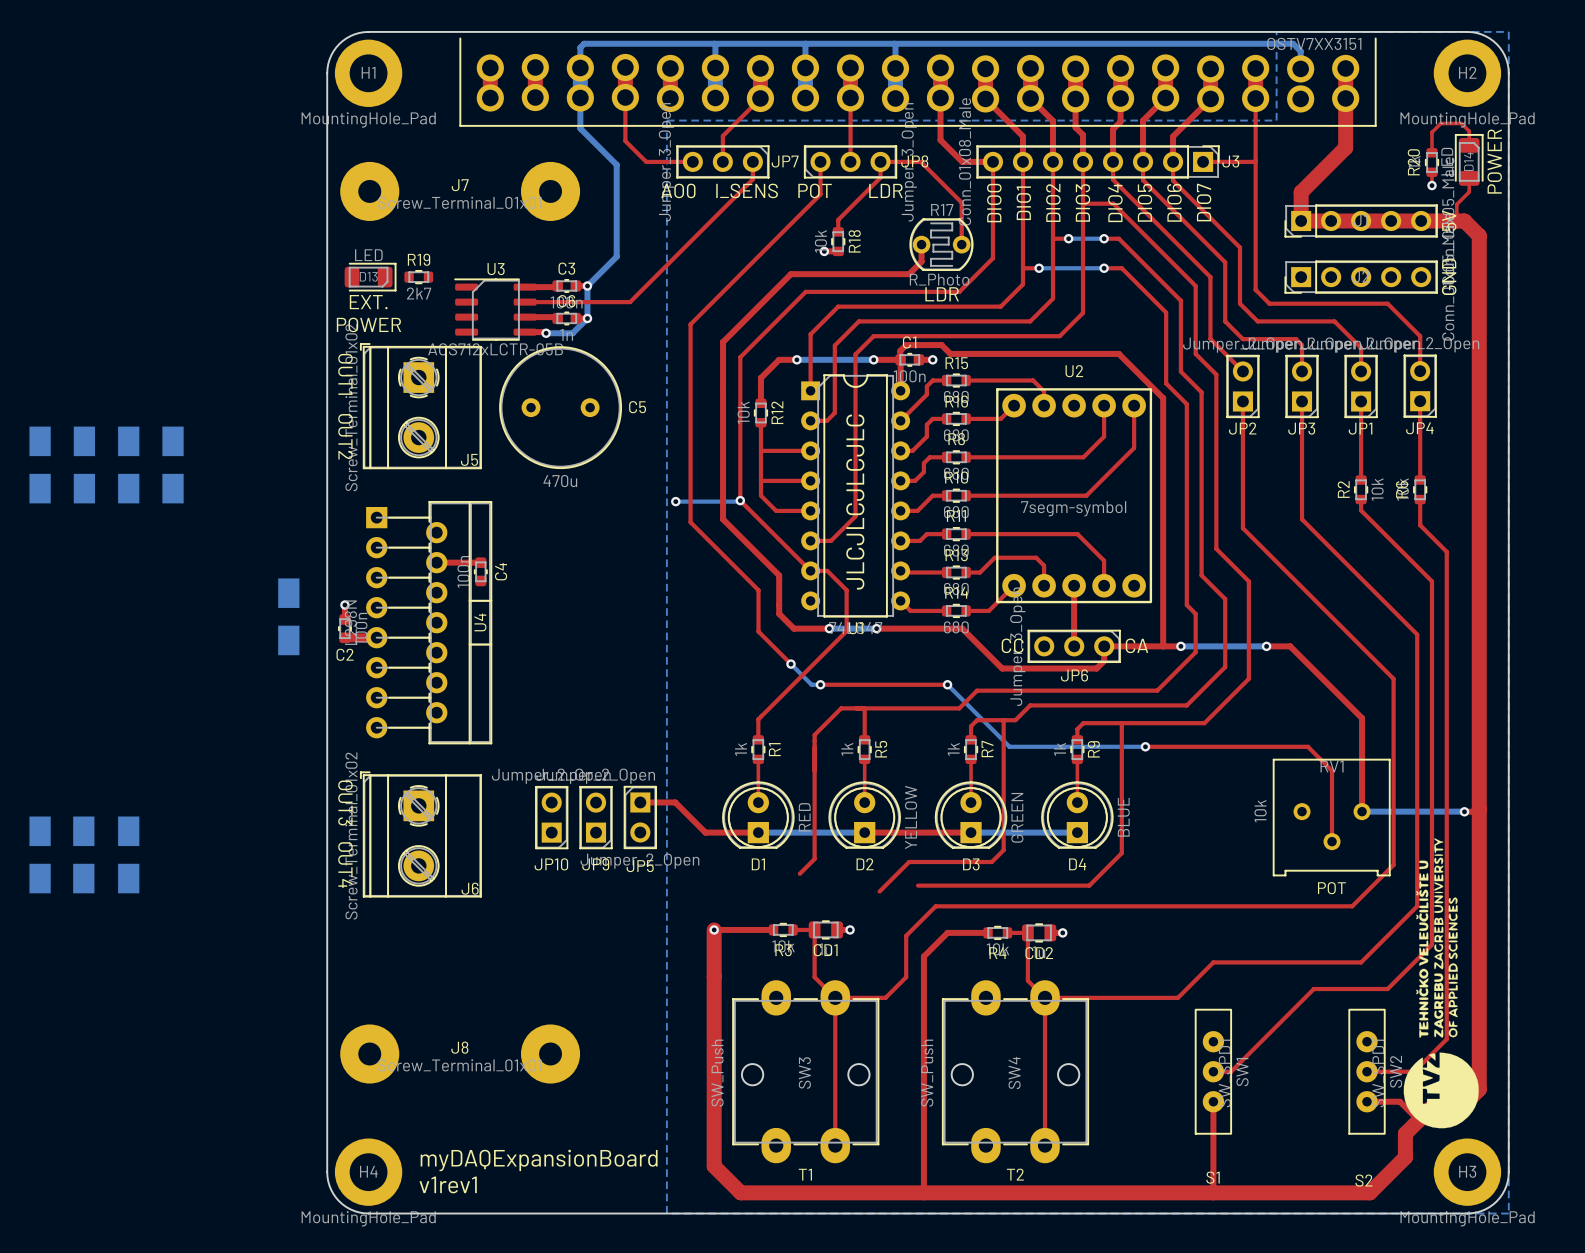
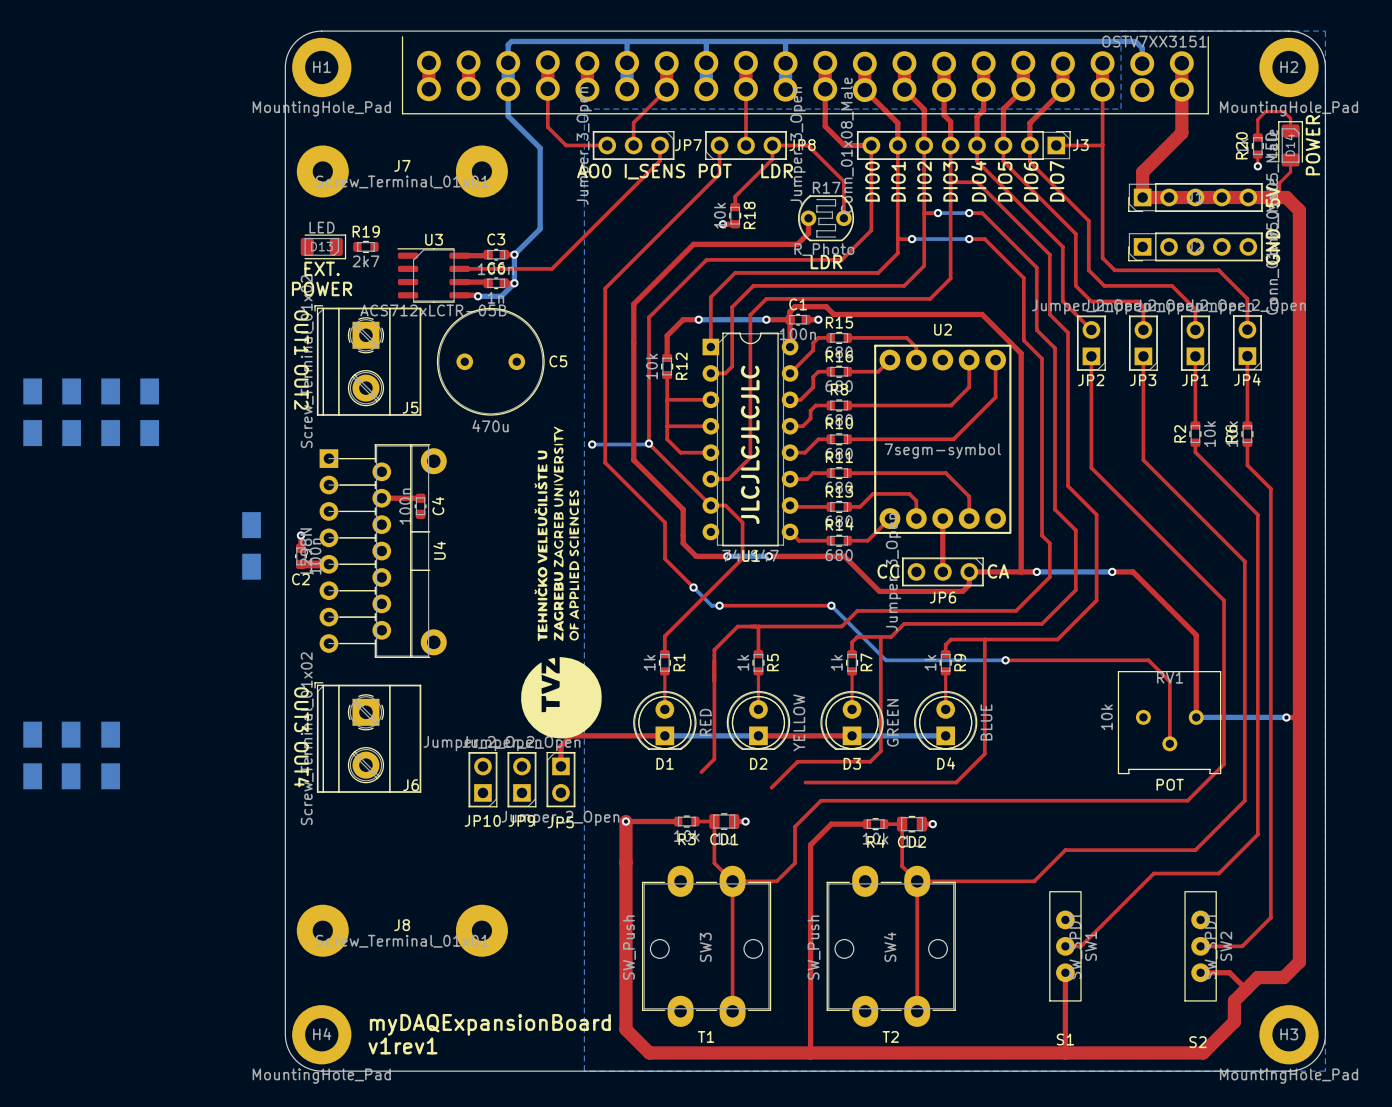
drawing: none -> [521, 426, 602, 739]
U4 footprint: [366, 501, 493, 745] -> [319, 444, 447, 658]
top track: (640, 802) (675, 802) (705, 832) -> (560, 766) (560, 746) (571, 735) (618, 735)
JP10 position: (551, 817) -> (482, 779)
JP9 position: (596, 817) -> (521, 779)
JP5 position: (640, 817) -> (560, 779)
drawing: [1403, 838, 1479, 1129] -> none

